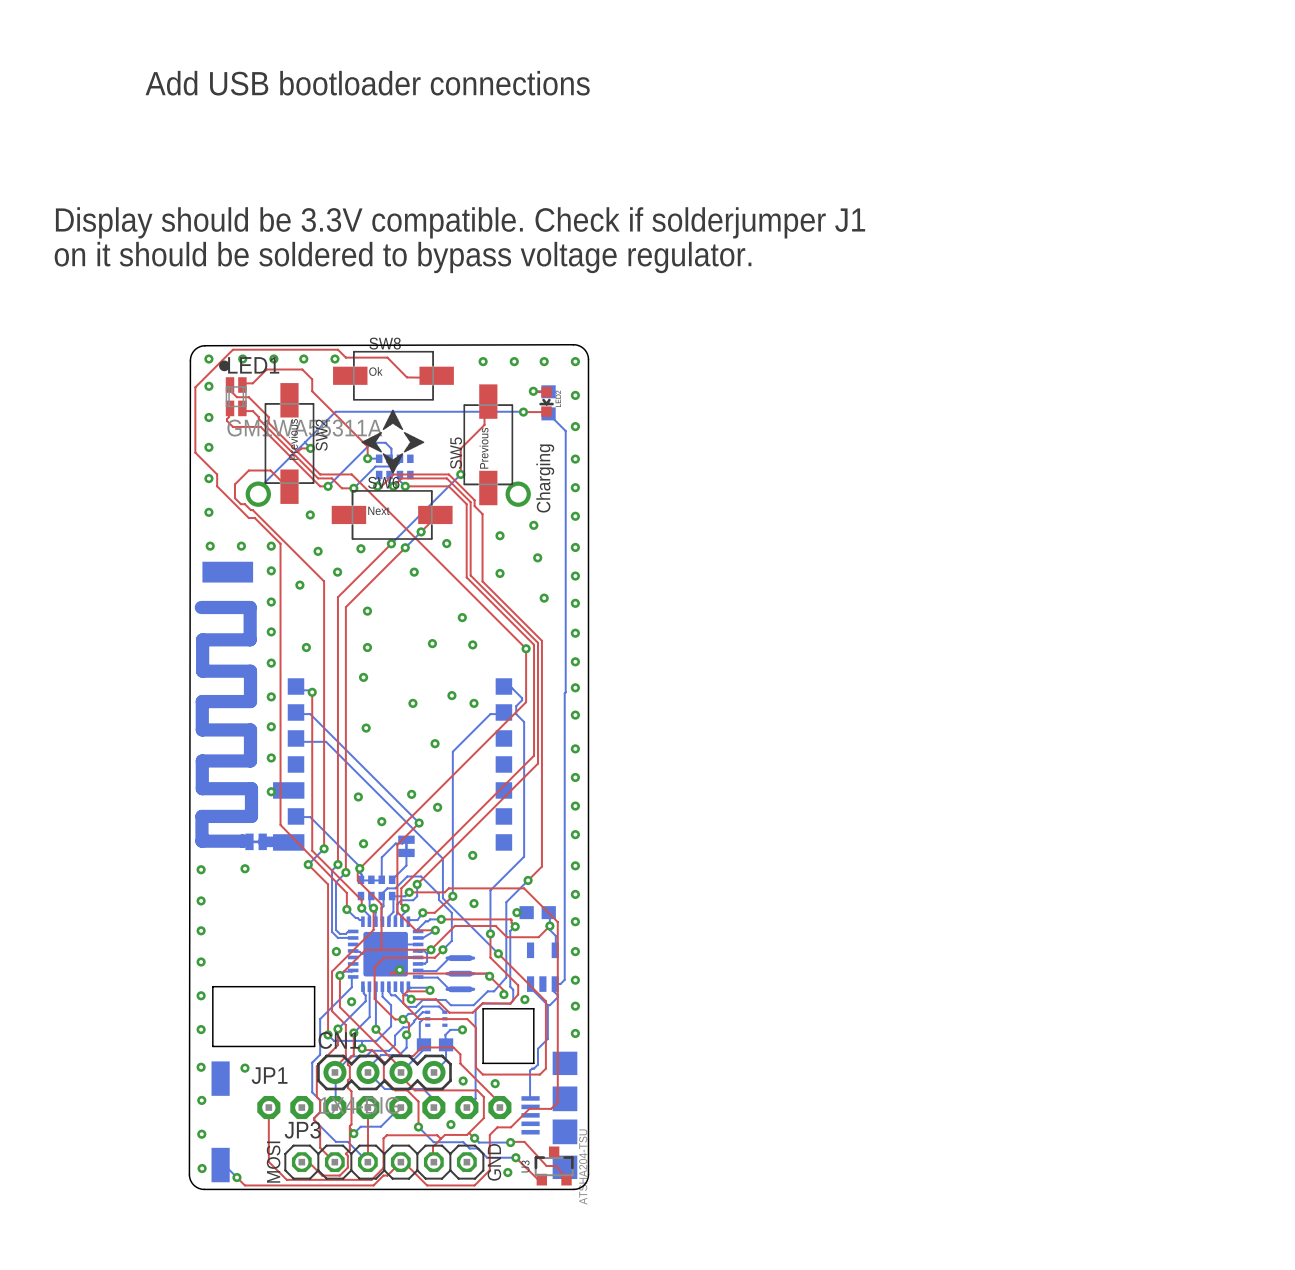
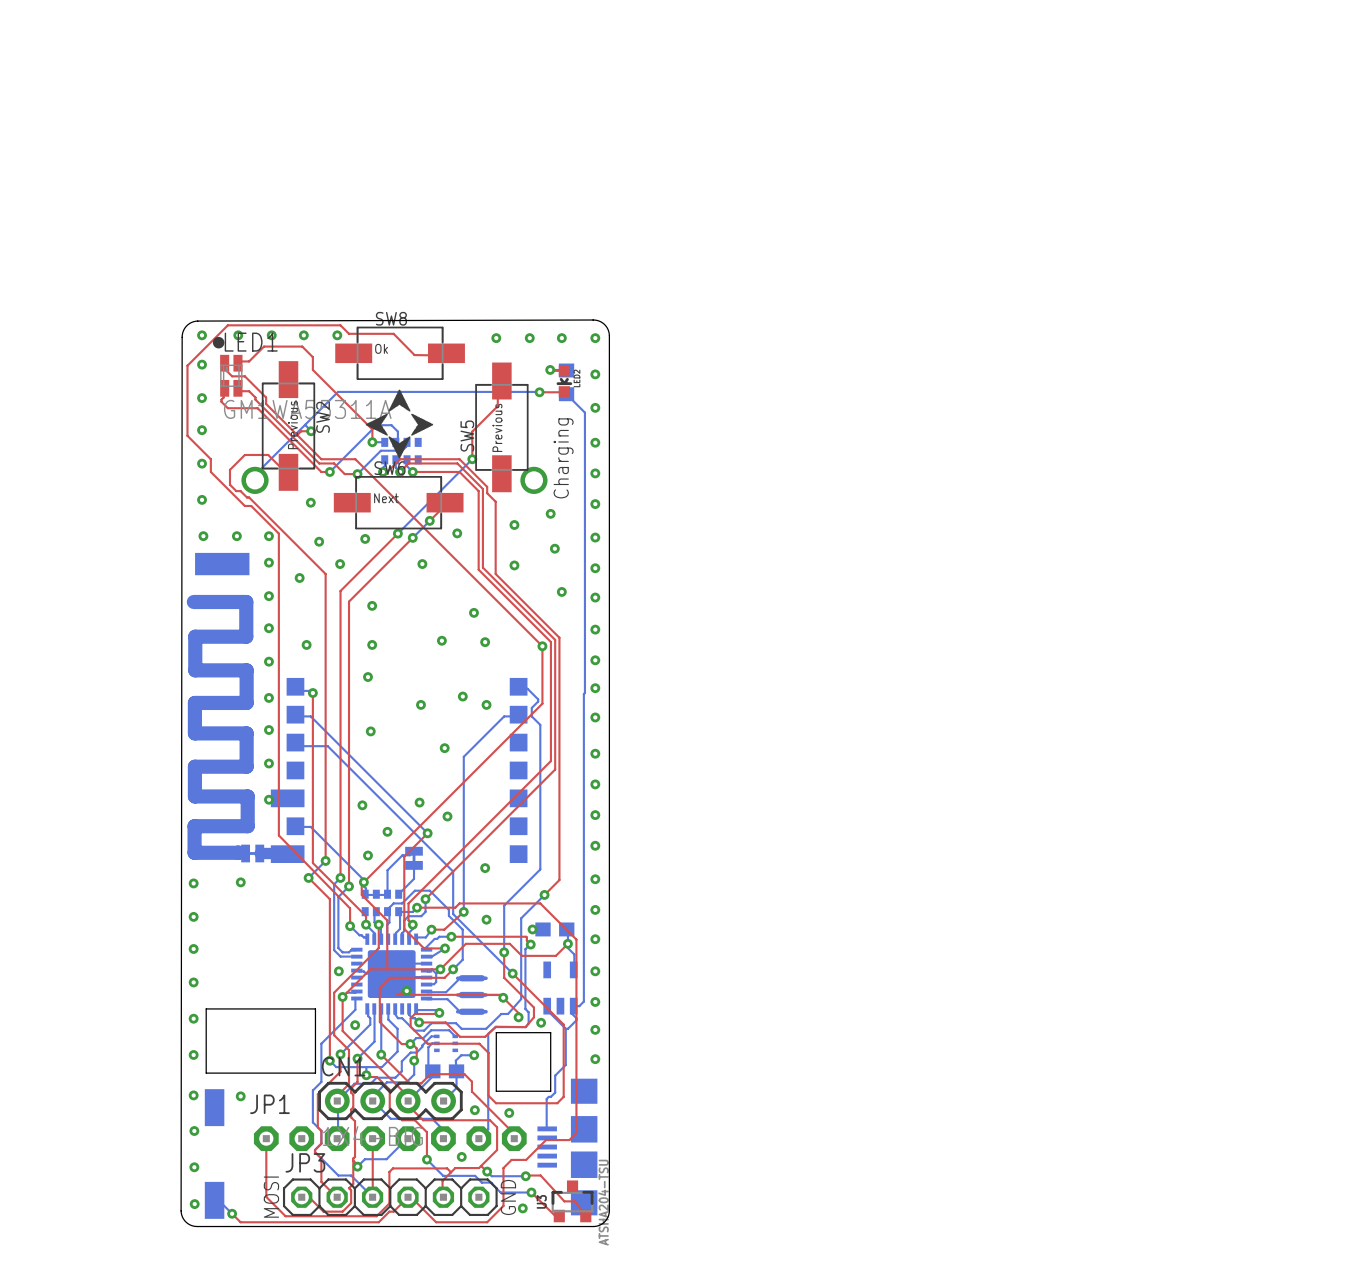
text: Add USB bootloader connections (367, 83) -> none
text: Display should be 3.3V compatible. Check if solderjumper J1 (460, 222) -> none
text: on it should be soldered to bypass voltage regulator. (403, 257) -> none

